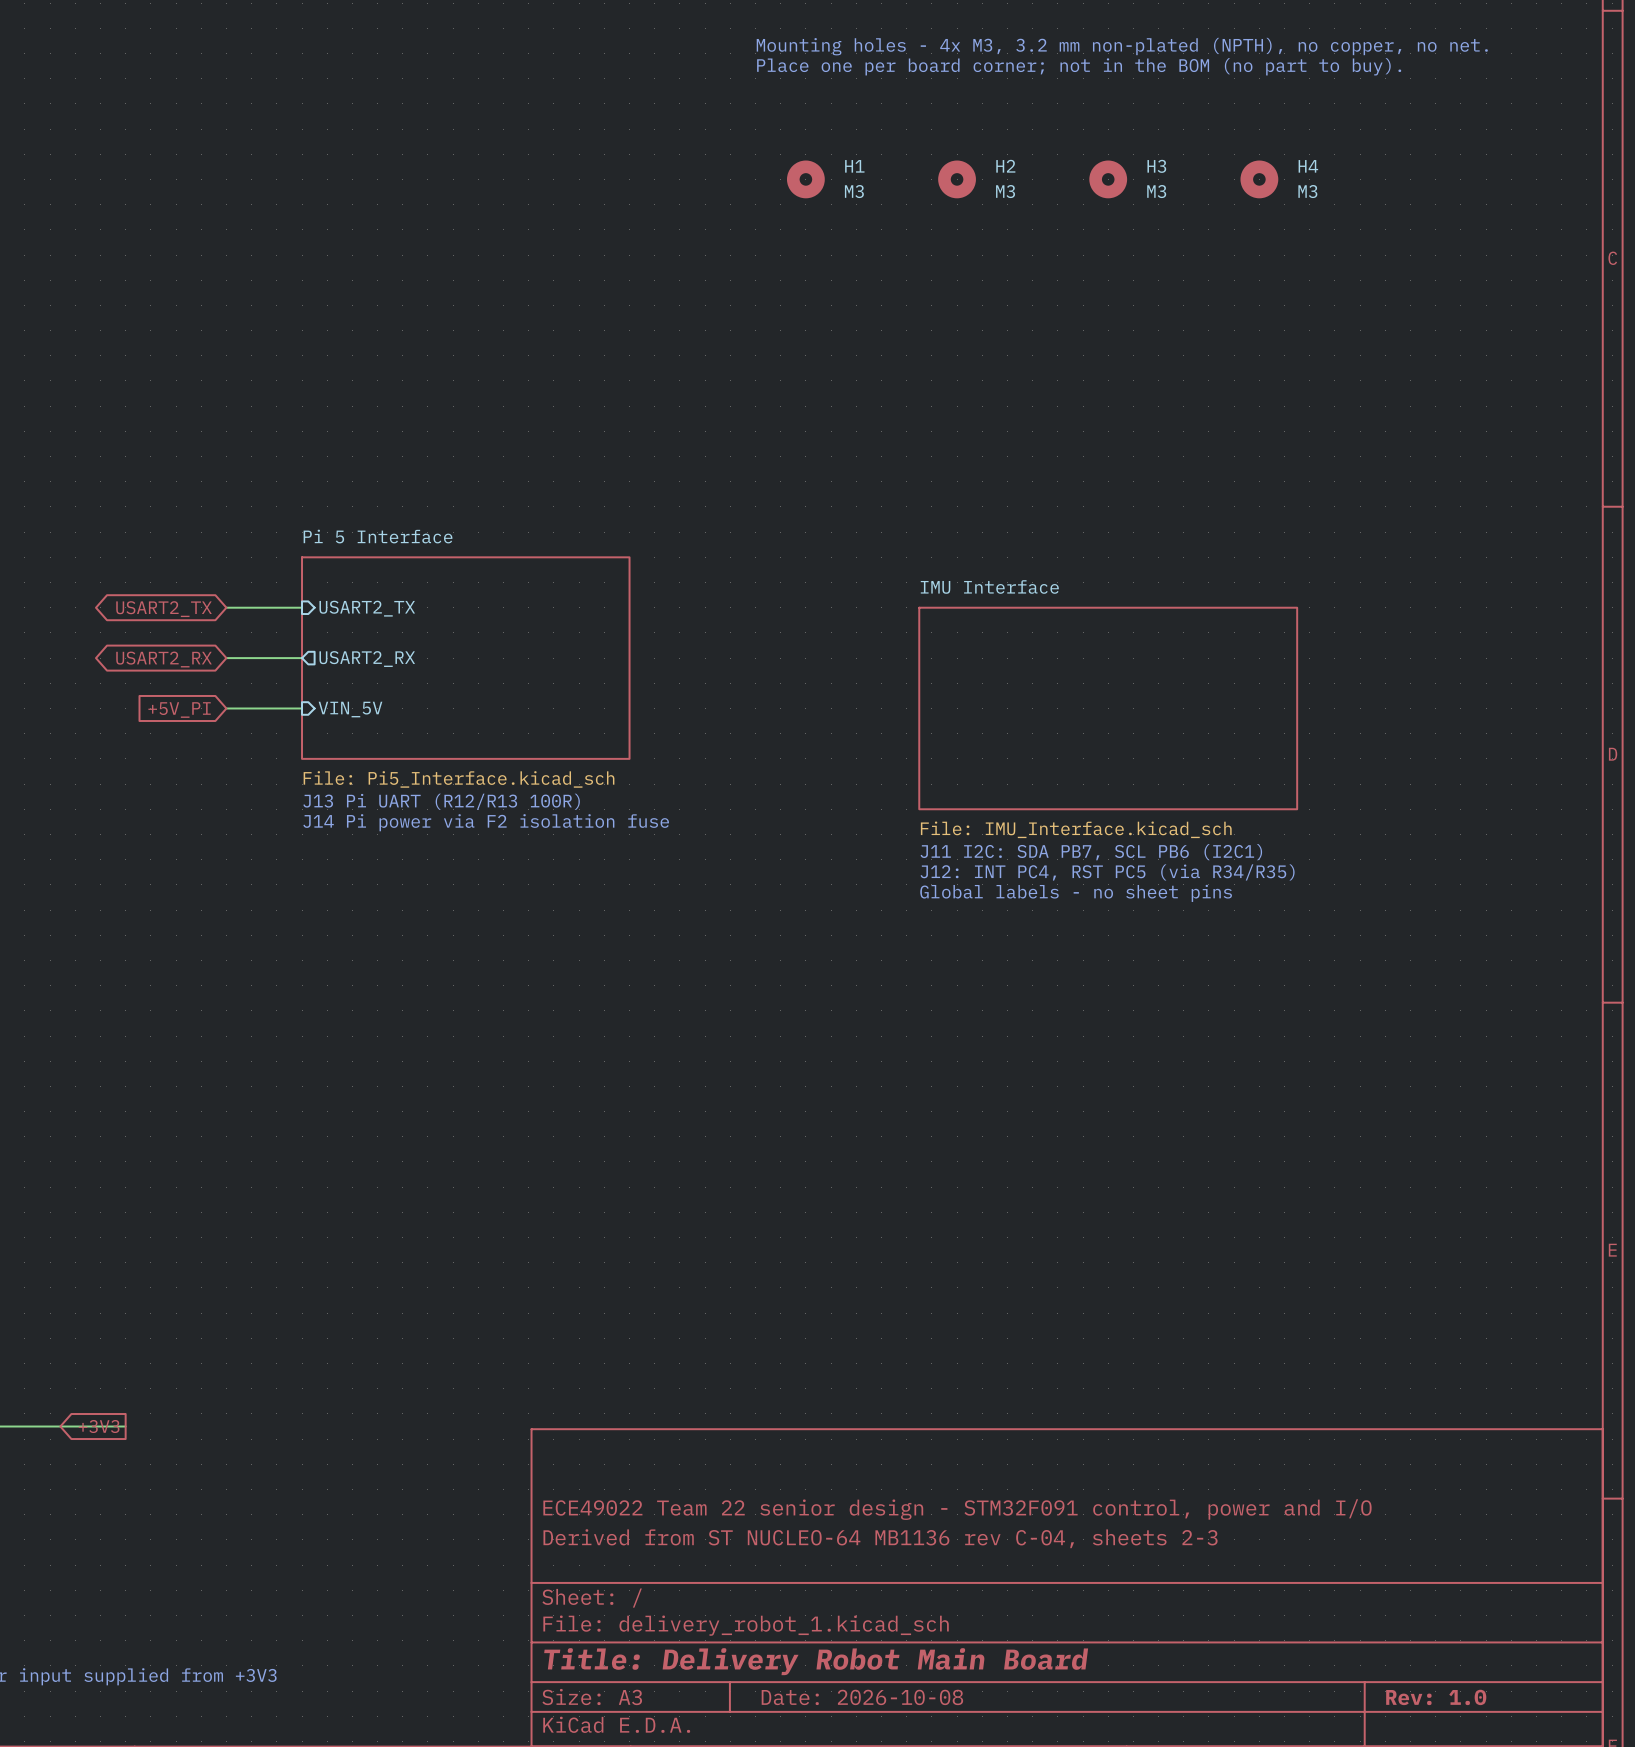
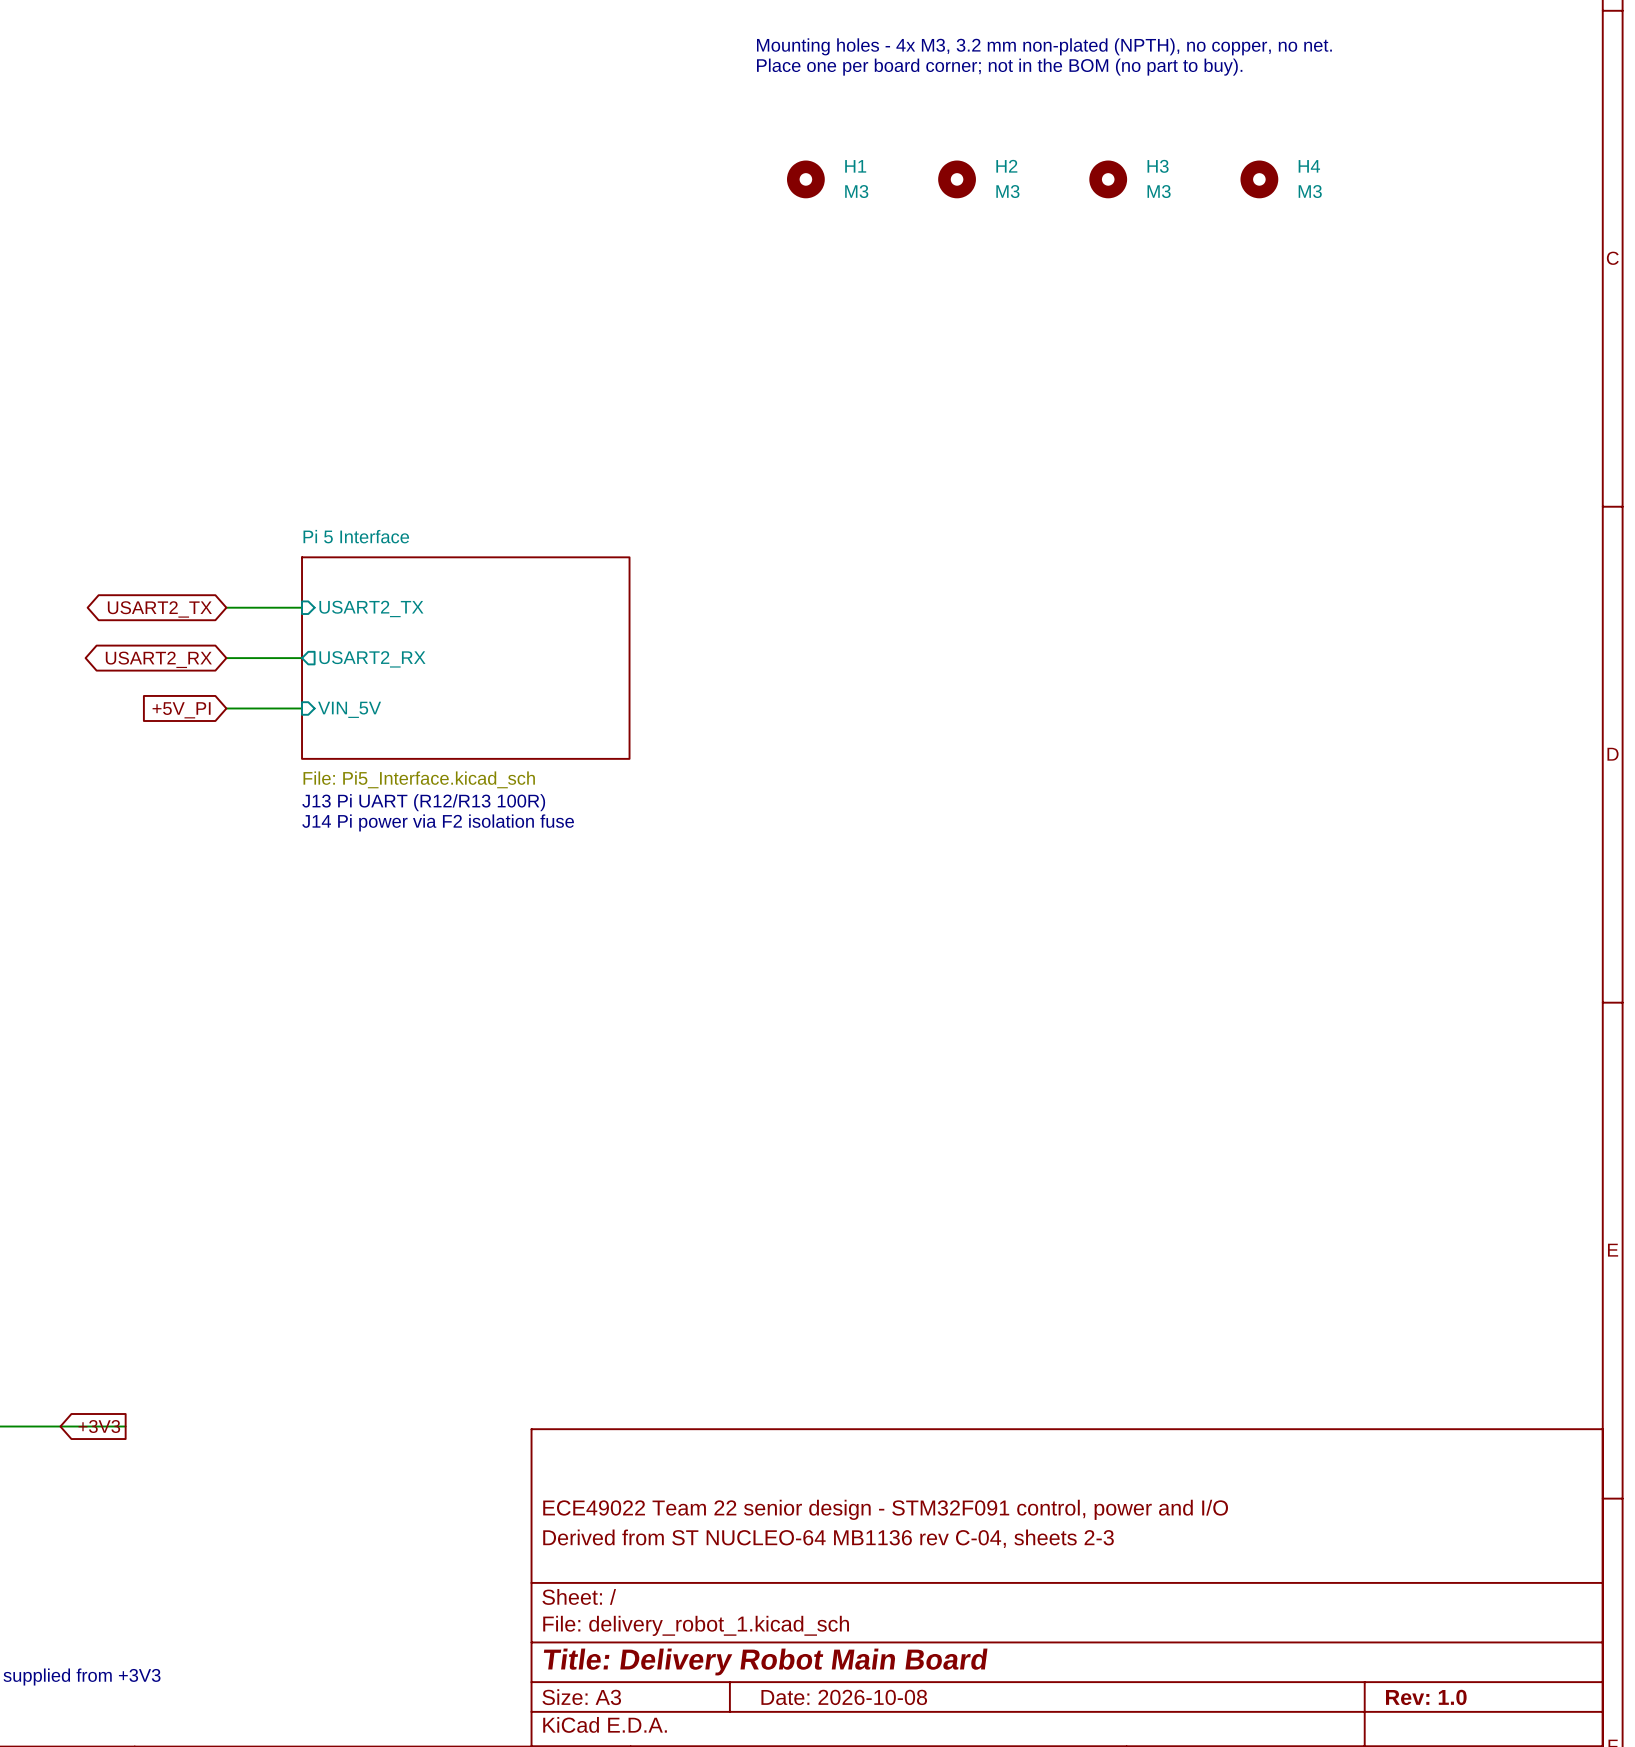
sheet IMU Interface: File: IMU_Interface.kicad_sch (1108, 708) -> none
text: J11 I2C: SDA PB7, SCL PB6 (I2C1) (1091, 852) -> none
text: J12: INT PC4, RST PC5 (via R34/R35) (1107, 872) -> none
text: Global labels - no sheet pins (1076, 893) -> none

